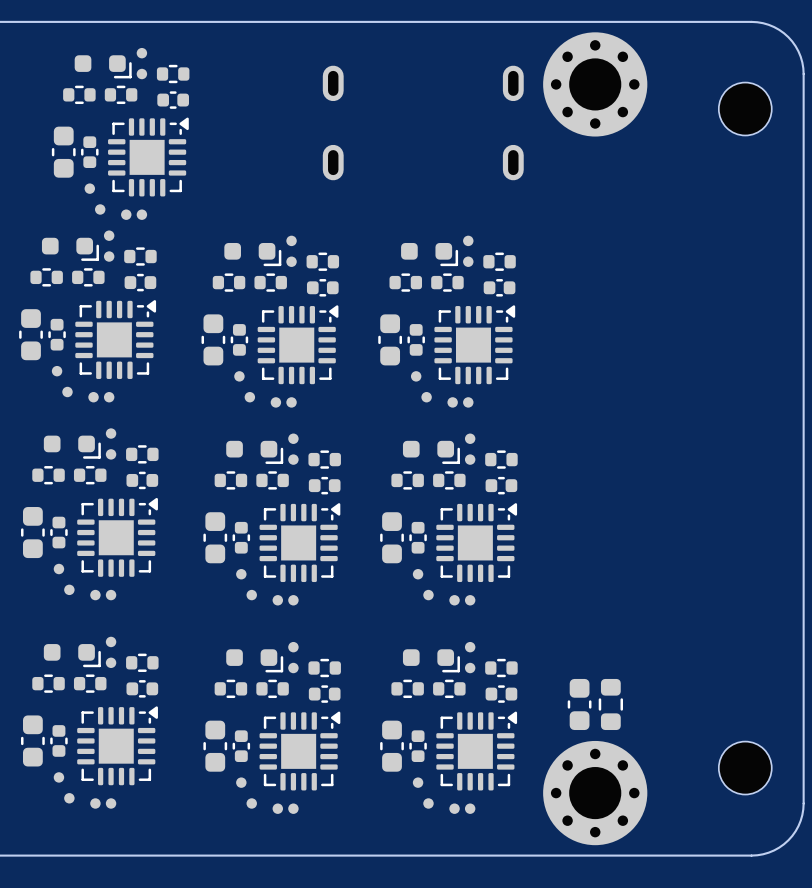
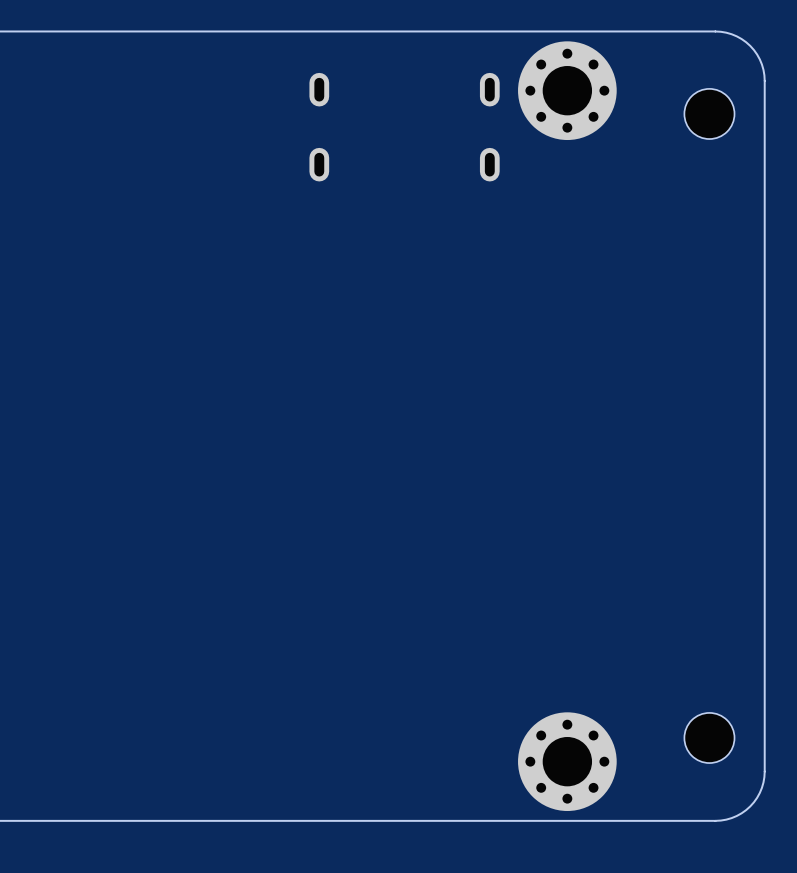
part: (141, 53) -> none
part: (103, 66) -> none
part: (141, 74) -> none
part: (173, 74) -> none
part: (79, 94) -> none
part: (121, 94) -> none
part: (173, 100) -> none
part: (63, 152) -> none
part: (89, 152) -> none
part: (148, 157) -> none
part: (89, 188) -> none
part: (100, 209) -> none
part: (126, 214) -> none
part: (141, 214) -> none
part: (109, 235) -> none
part: (291, 240) -> none
part: (468, 240) -> none
part: (70, 249) -> none
part: (252, 254) -> none
part: (429, 254) -> none
part: (109, 256) -> none
part: (140, 256) -> none
part: (291, 261) -> none
part: (322, 261) -> none
part: (468, 261) -> none
part: (499, 261) -> none
part: (46, 277) -> none
part: (88, 277) -> none
part: (140, 282) -> none
part: (229, 282) -> none
part: (270, 282) -> none
part: (405, 282) -> none
part: (447, 282) -> none
part: (322, 287) -> none
part: (499, 287) -> none
part: (31, 334) -> none
part: (57, 334) -> none
part: (115, 339) -> none
part: (213, 339) -> none
part: (239, 339) -> none
part: (390, 339) -> none
part: (416, 339) -> none
part: (298, 344) -> none
part: (474, 344) -> none
part: (57, 371) -> none
part: (239, 376) -> none
part: (416, 376) -> none
part: (67, 392) -> none
part: (93, 397) -> none
part: (109, 397) -> none
part: (249, 397) -> none
part: (426, 397) -> none
part: (275, 402) -> none
part: (291, 402) -> none
part: (452, 402) -> none
part: (468, 402) -> none
part: (111, 433) -> none
part: (293, 438) -> none
part: (470, 438) -> none
part: (72, 447) -> none
part: (254, 452) -> none
part: (431, 452) -> none
part: (111, 454) -> none
part: (142, 454) -> none
part: (293, 459) -> none
part: (324, 459) -> none
part: (470, 459) -> none
part: (501, 459) -> none
part: (48, 475) -> none
part: (90, 475) -> none
part: (142, 480) -> none
part: (230, 480) -> none
part: (272, 480) -> none
part: (407, 480) -> none
part: (449, 480) -> none
part: (324, 485) -> none
part: (501, 485) -> none
part: (32, 532) -> none
part: (58, 532) -> none
part: (117, 537) -> none
part: (215, 537) -> none
part: (241, 537) -> none
part: (392, 537) -> none
part: (418, 537) -> none
part: (299, 542) -> none
part: (476, 542) -> none
part: (58, 569) -> none
part: (241, 574) -> none
part: (418, 574) -> none
part: (69, 589) -> none
part: (95, 595) -> none
part: (111, 595) -> none
part: (251, 595) -> none
part: (428, 595) -> none
part: (277, 600) -> none
part: (293, 600) -> none
part: (454, 600) -> none
part: (470, 600) -> none
part: (111, 641) -> none
part: (293, 647) -> none
part: (470, 647) -> none
part: (72, 655) -> none
part: (254, 660) -> none
part: (431, 660) -> none
part: (111, 662) -> none
part: (142, 662) -> none
part: (293, 668) -> none
part: (324, 668) -> none
part: (470, 668) -> none
part: (501, 668) -> none
part: (48, 683) -> none
part: (90, 683) -> none
part: (142, 688) -> none
part: (230, 688) -> none
part: (272, 688) -> none
part: (407, 688) -> none
part: (449, 688) -> none
part: (324, 694) -> none
part: (501, 694) -> none
part: (579, 704) -> none
part: (610, 704) -> none
part: (32, 740) -> none
part: (58, 740) -> none
part: (117, 745) -> none
part: (215, 746) -> none
part: (241, 746) -> none
part: (392, 746) -> none
part: (418, 746) -> none
part: (299, 751) -> none
part: (476, 751) -> none
part: (58, 777) -> none
part: (241, 782) -> none
part: (418, 782) -> none
part: (69, 798) -> none
part: (95, 803) -> none
part: (111, 803) -> none
part: (251, 803) -> none
part: (428, 803) -> none
part: (277, 808) -> none
part: (293, 808) -> none
part: (454, 808) -> none
part: (470, 808) -> none

